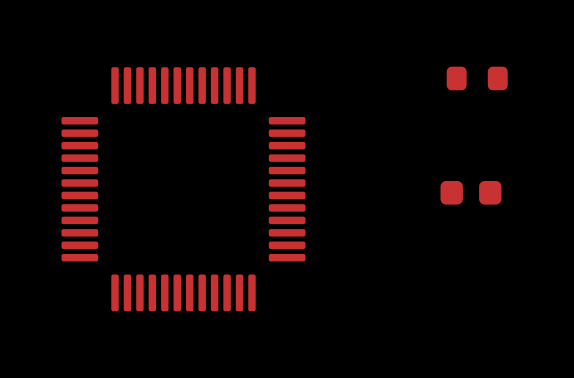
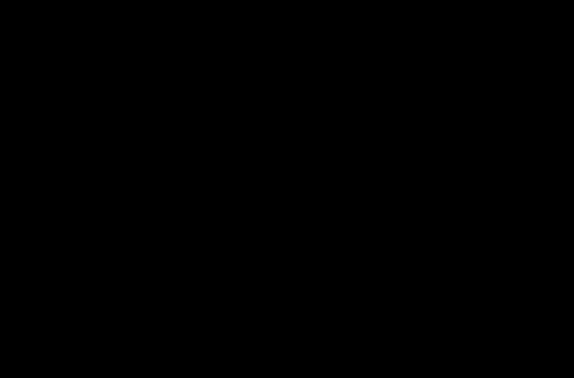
part: (477, 78) -> none
part: (183, 189) -> none
part: (470, 192) -> none

